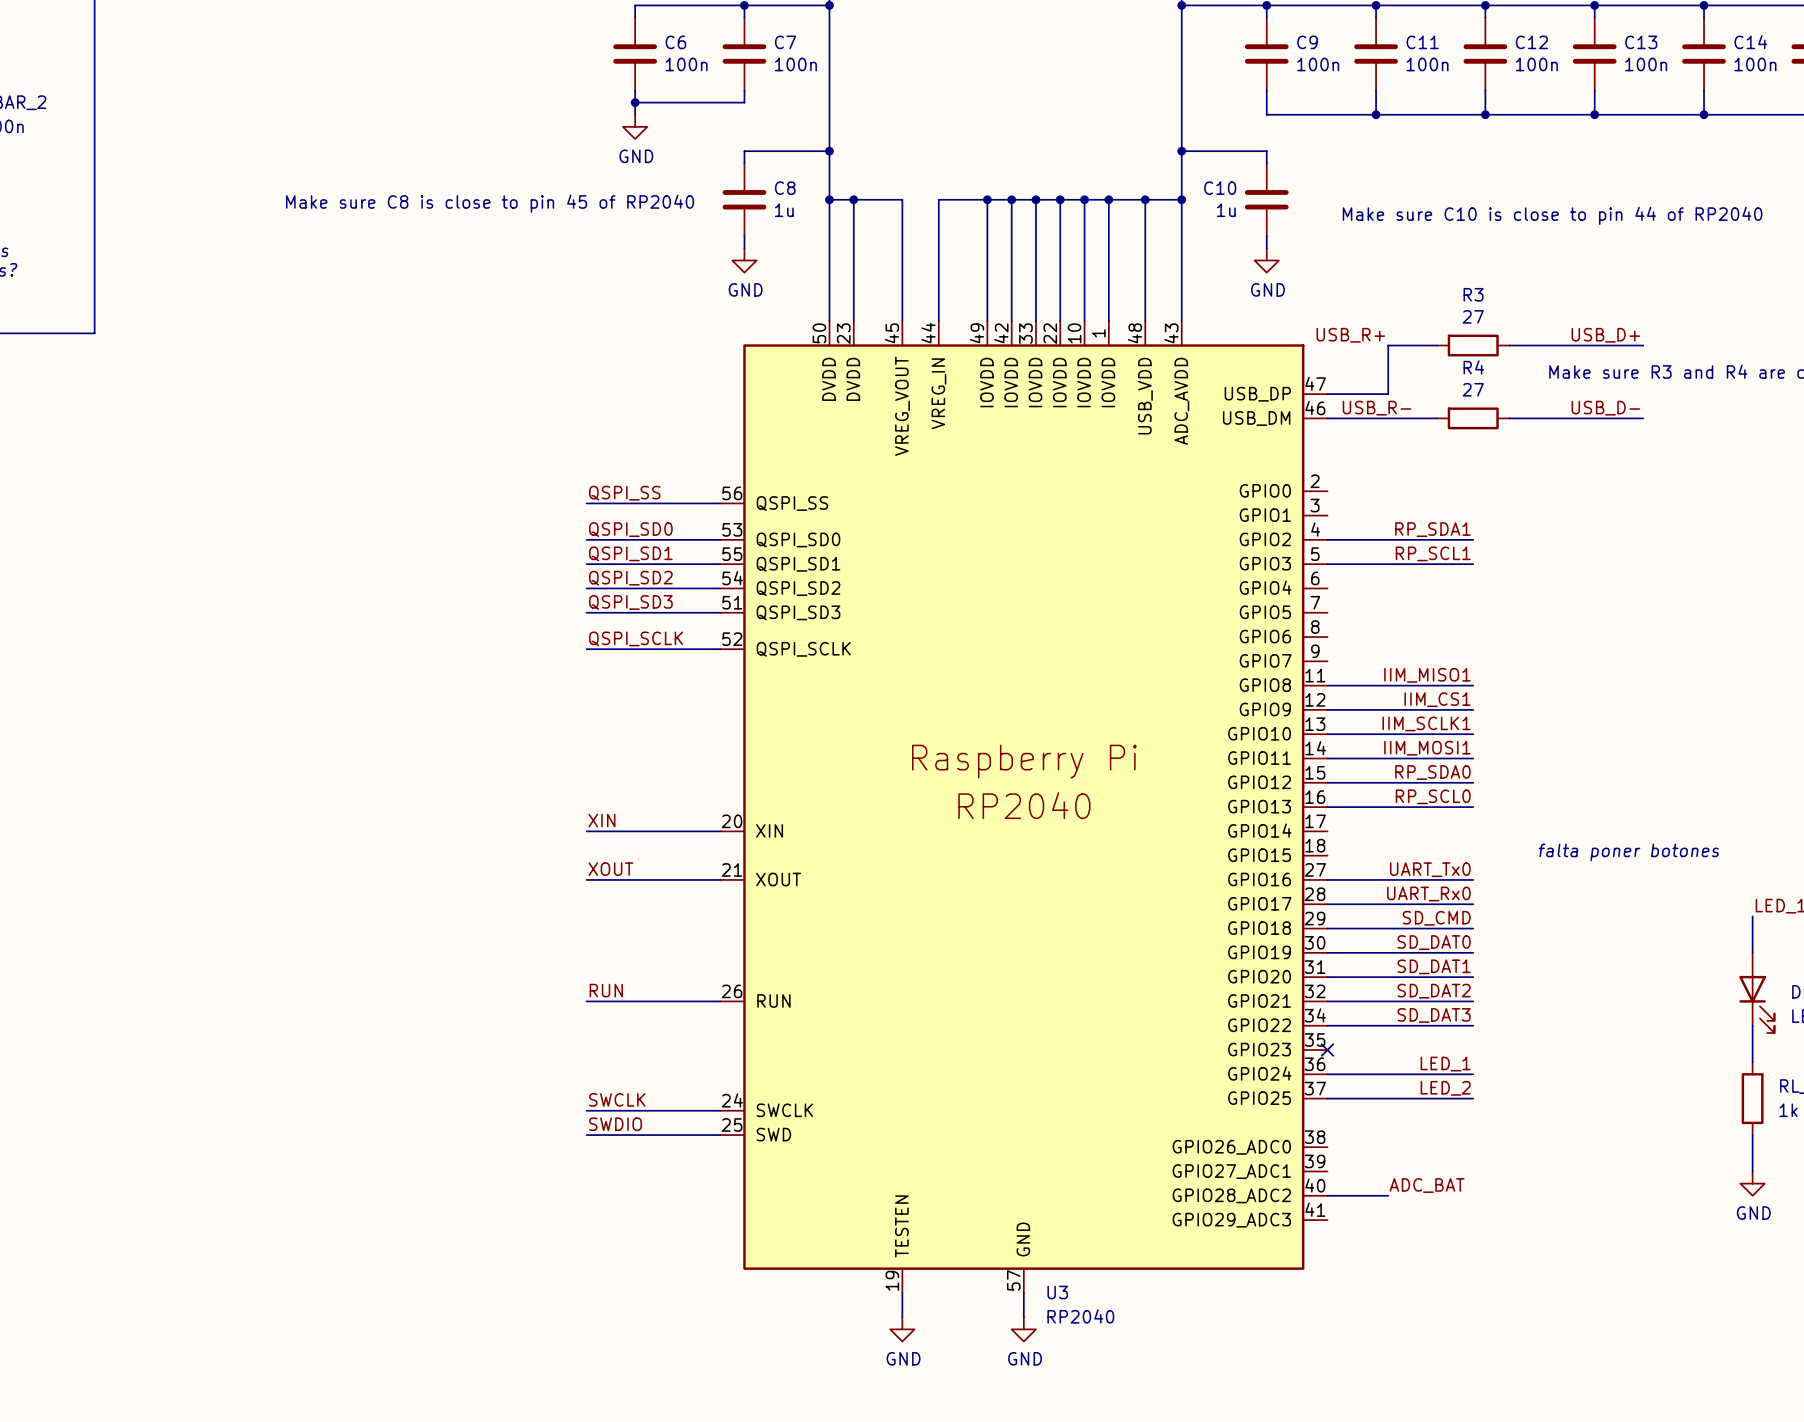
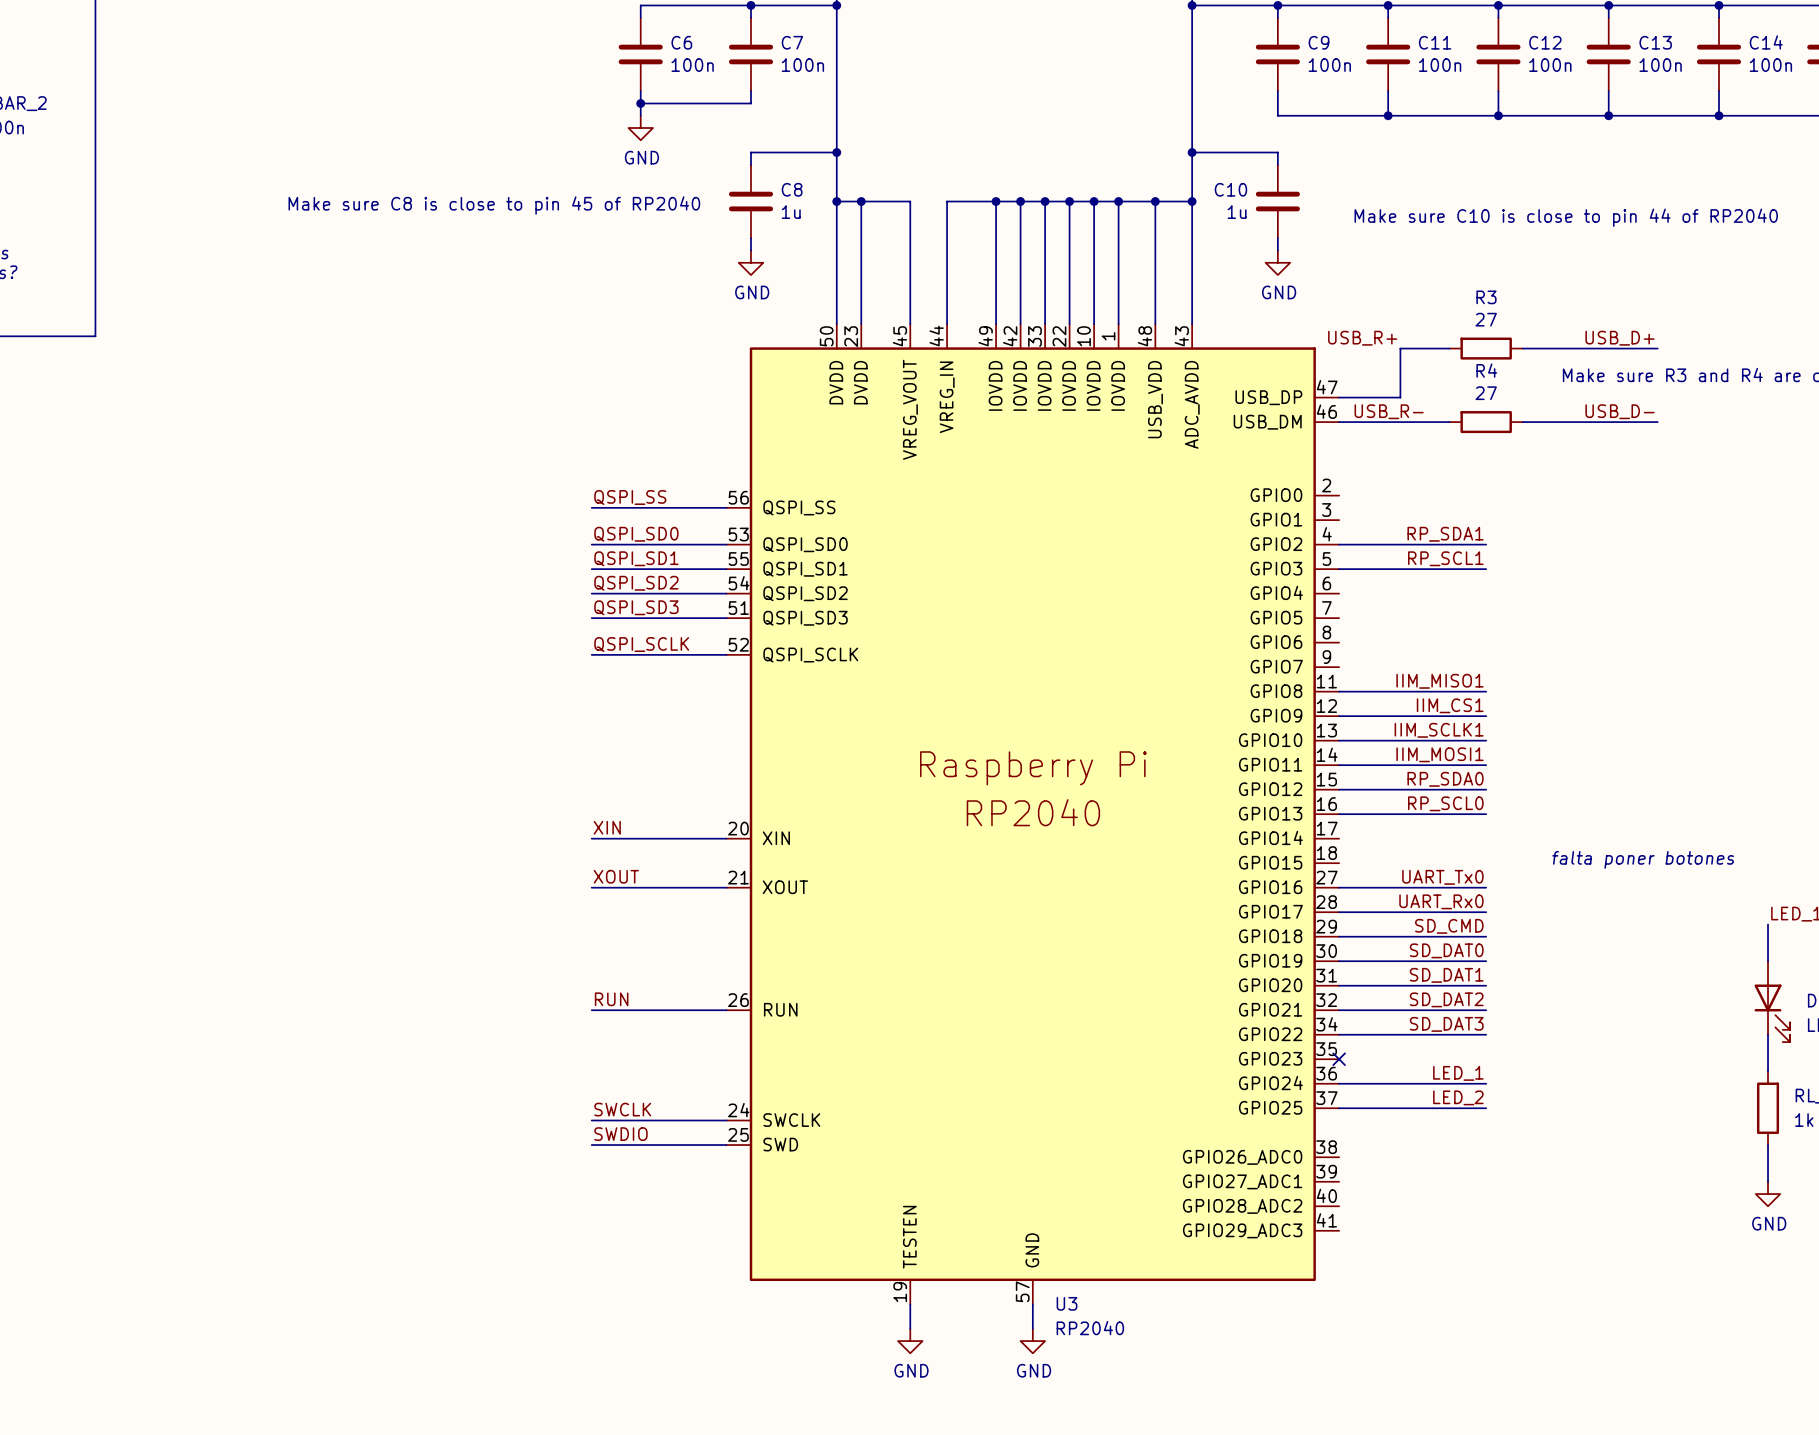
label: ADC_BAT (1427, 1185) -> none
wire: (1327, 1195) (1388, 1195) -> none

